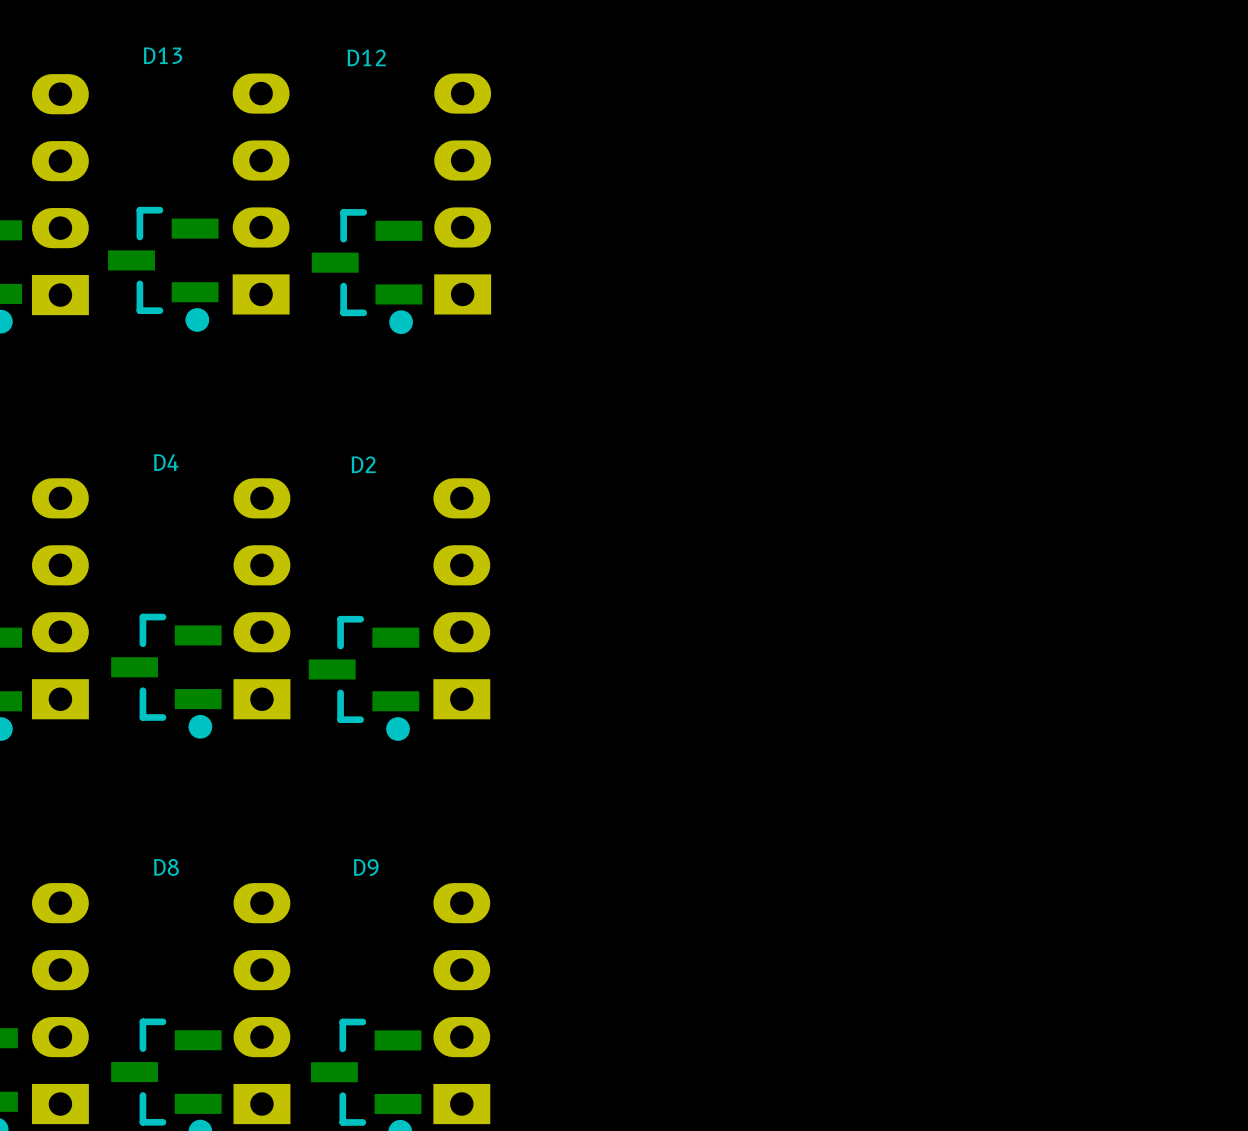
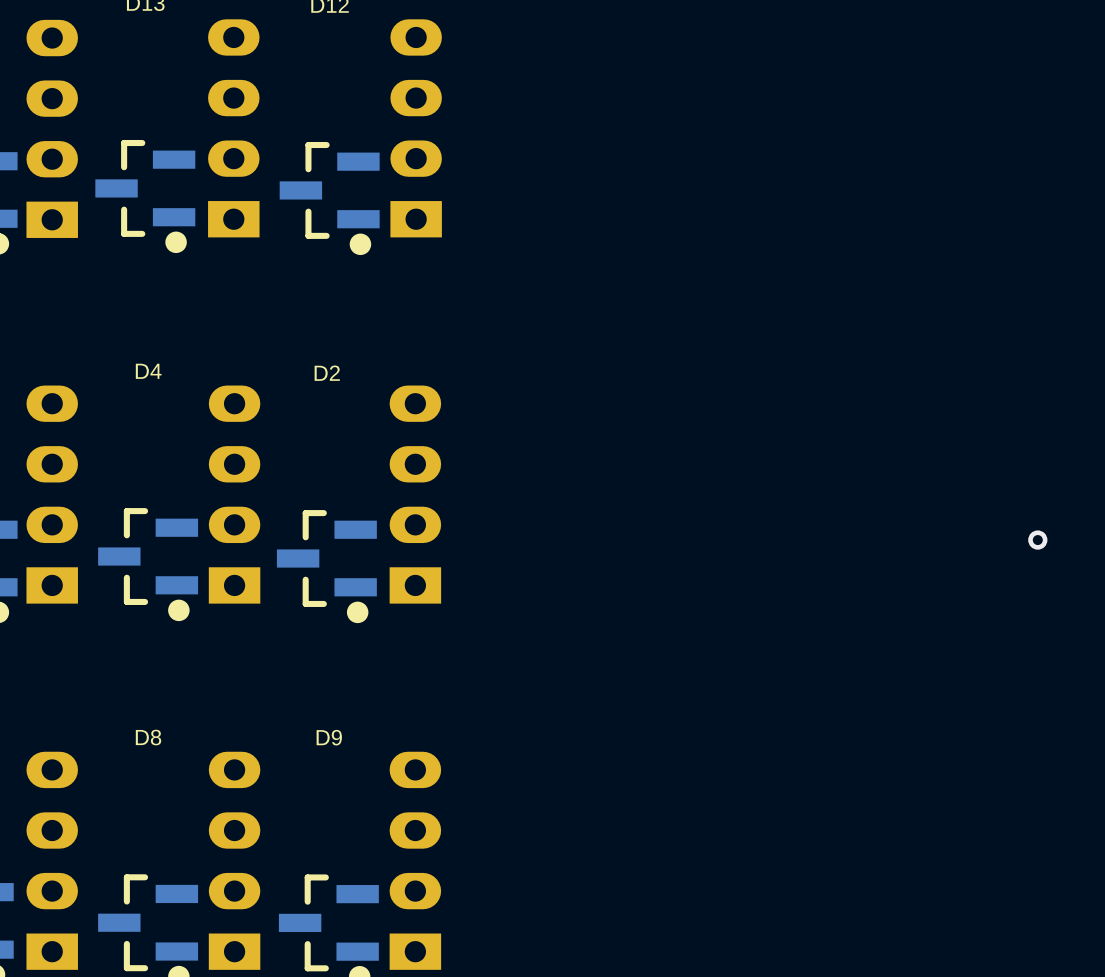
via: none -> (1037, 540)

